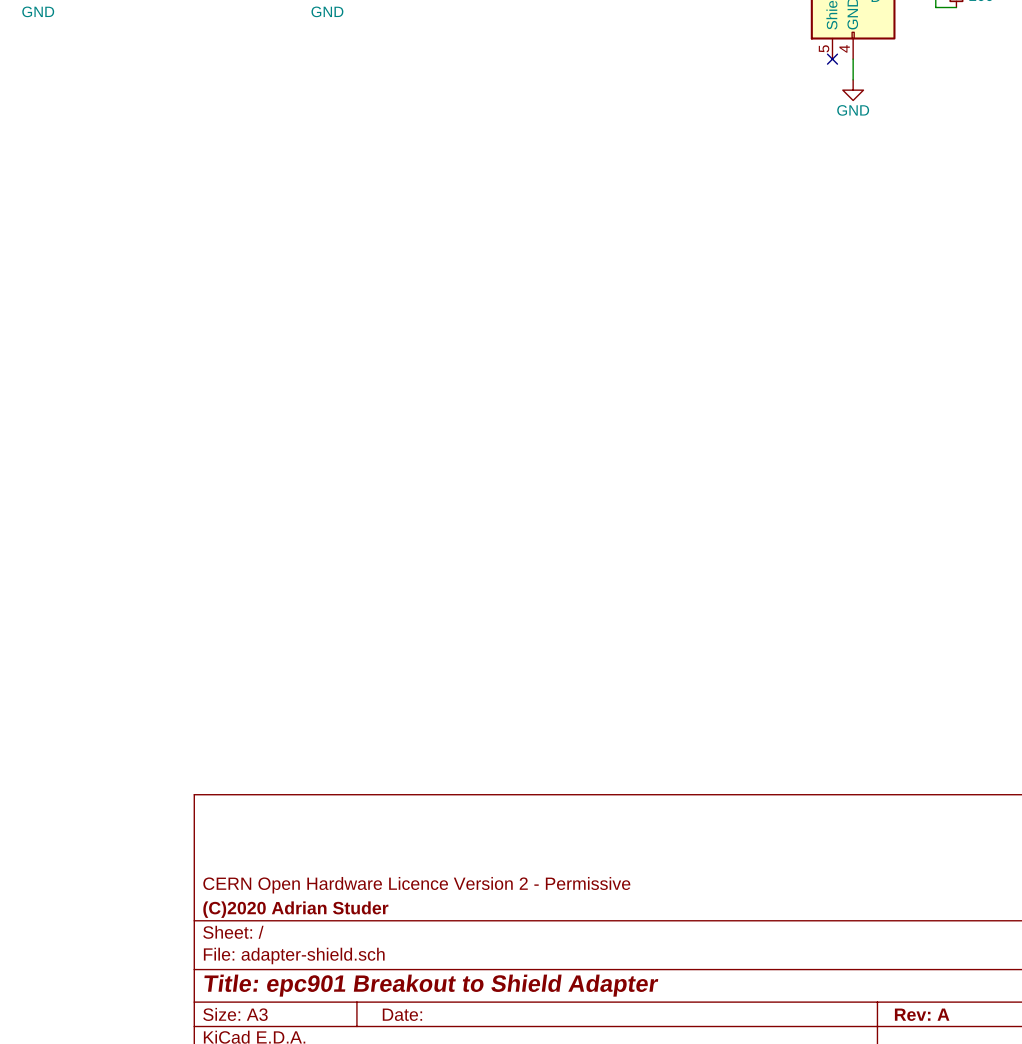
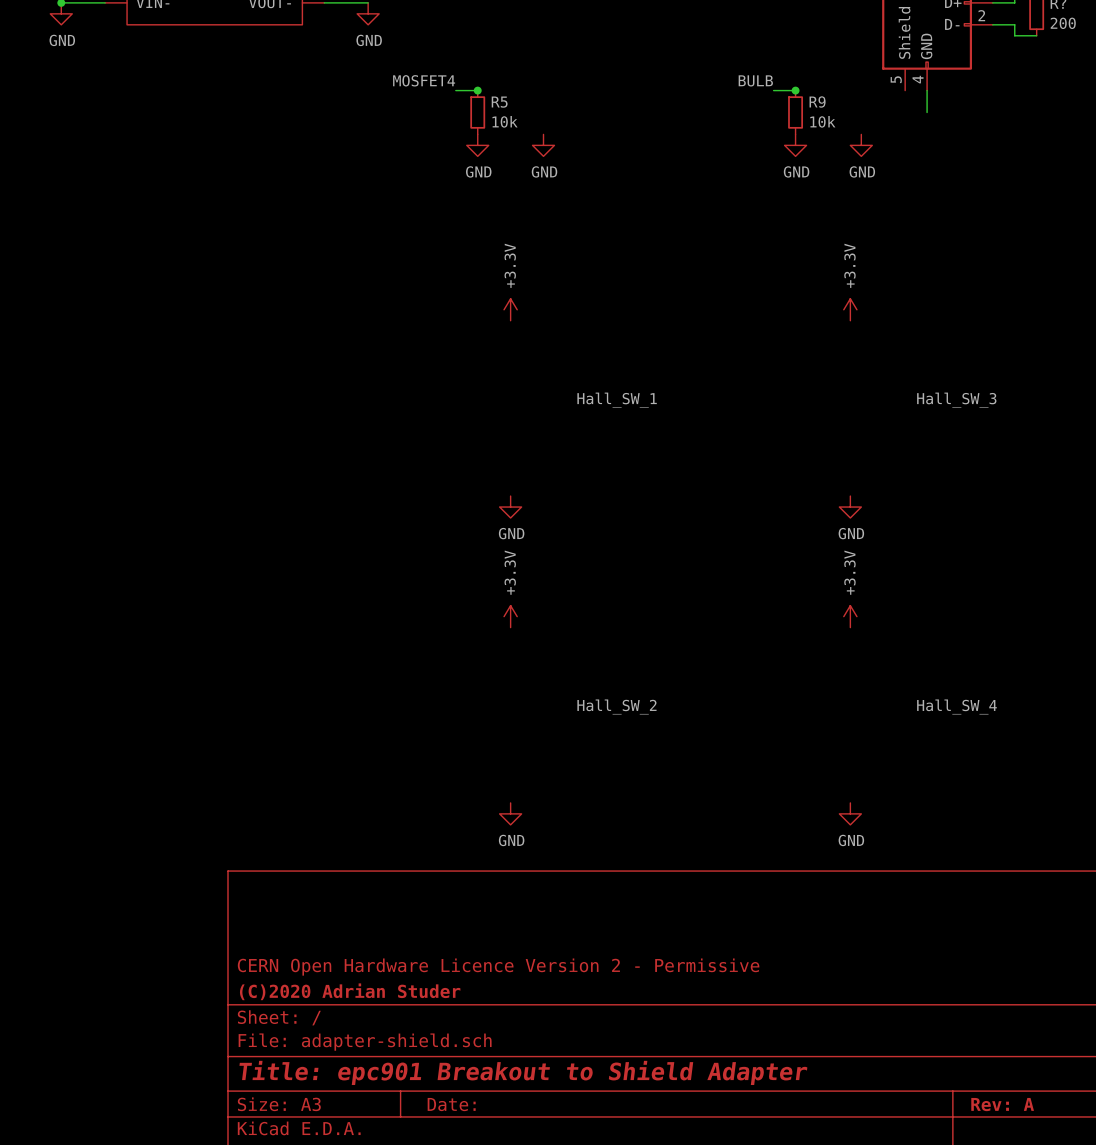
label: none -> MOSFET4 (424, 80)
label: none -> BULB (755, 80)
wire: none -> (455, 90) (477, 90)
junction: none -> (477, 90)
wire: none -> (773, 90) (795, 90)
junction: none -> (795, 90)
no-connect mark: (832, 59) -> none
R5: none -> 10k (477, 112)
R9: none -> 10k (795, 112)
power symbol: GND (853, 90) -> none
power symbol: none -> GND (477, 145)
power symbol: none -> GND (543, 145)
power symbol: none -> GND (795, 145)
power symbol: none -> GND (861, 145)
power symbol: none -> +3.3V (510, 309)
power symbol: none -> +3.3V (850, 309)
label: none -> Hall_SW_1 (617, 400)
label: none -> Hall_SW_3 (956, 400)
power symbol: none -> GND (510, 507)
power symbol: none -> GND (850, 507)
power symbol: none -> +3.3V (510, 616)
power symbol: none -> +3.3V (850, 616)
label: none -> Hall_SW_2 (616, 706)
label: none -> Hall_SW_4 (956, 706)
power symbol: none -> GND (510, 813)
power symbol: none -> GND (850, 813)

